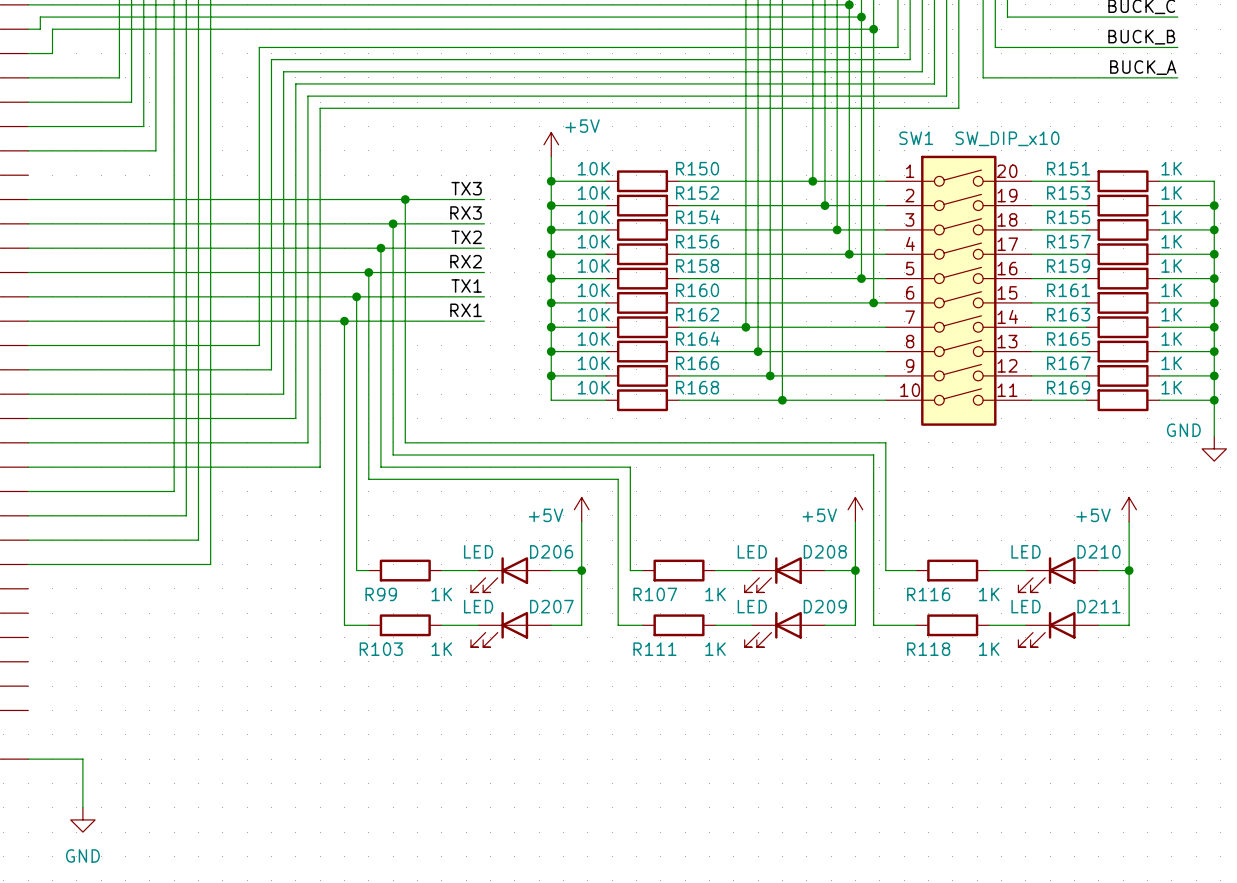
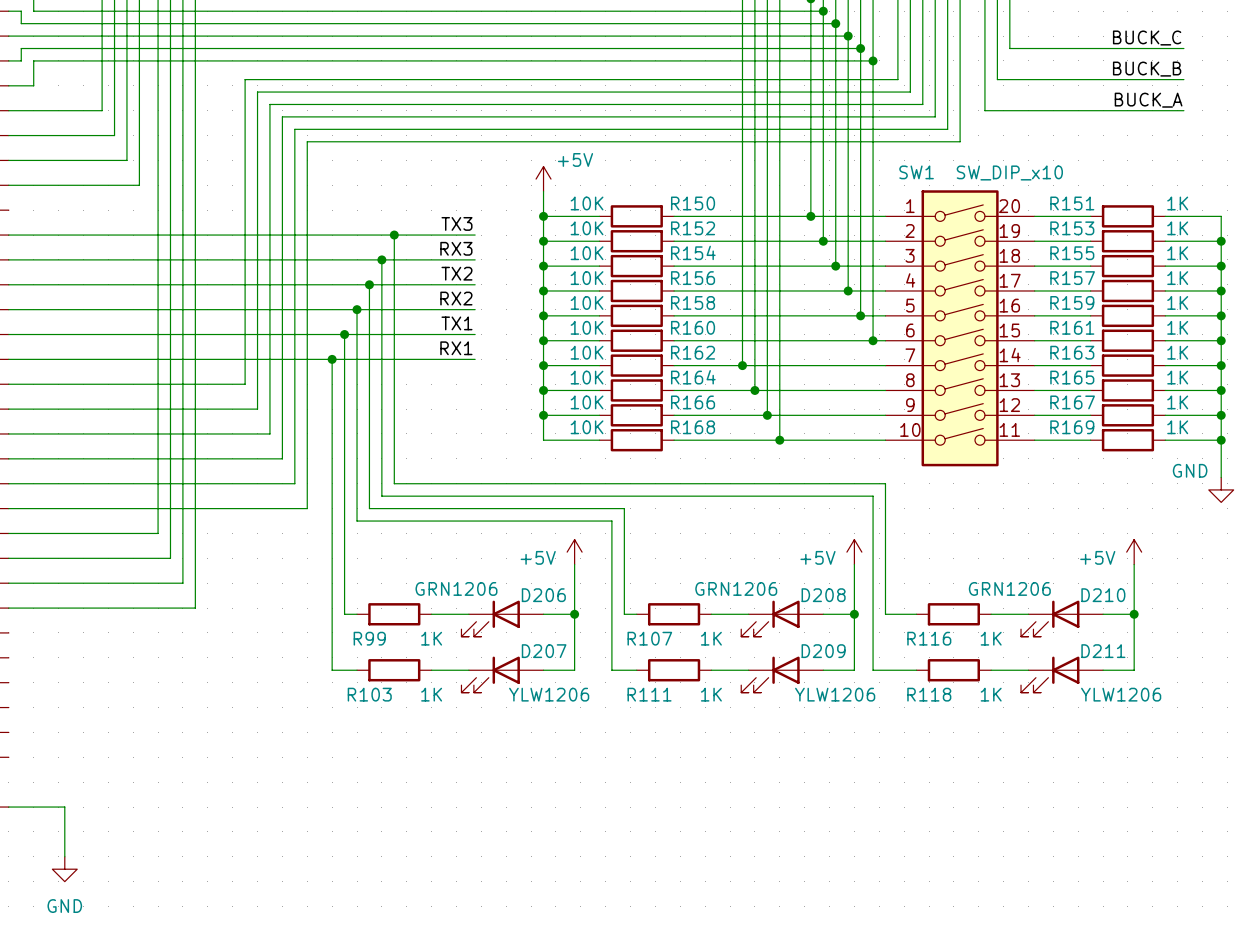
D206 value: LED (478, 551) -> GRN1206 (456, 588)
D208 value: LED (752, 551) -> GRN1206 (736, 588)
D210 value: LED (1026, 551) -> GRN1206 (1009, 588)
D207 value: LED (478, 606) -> YLW1206 (549, 694)
D209 value: LED (752, 606) -> YLW1206 (835, 694)
D211 value: LED (1026, 606) -> YLW1206 (1121, 694)

